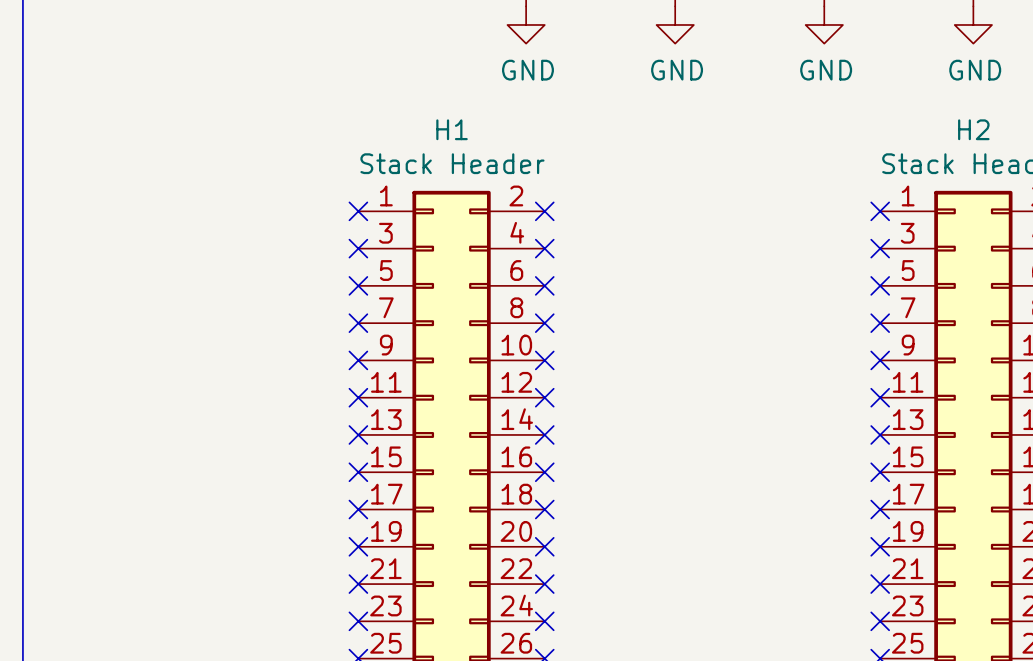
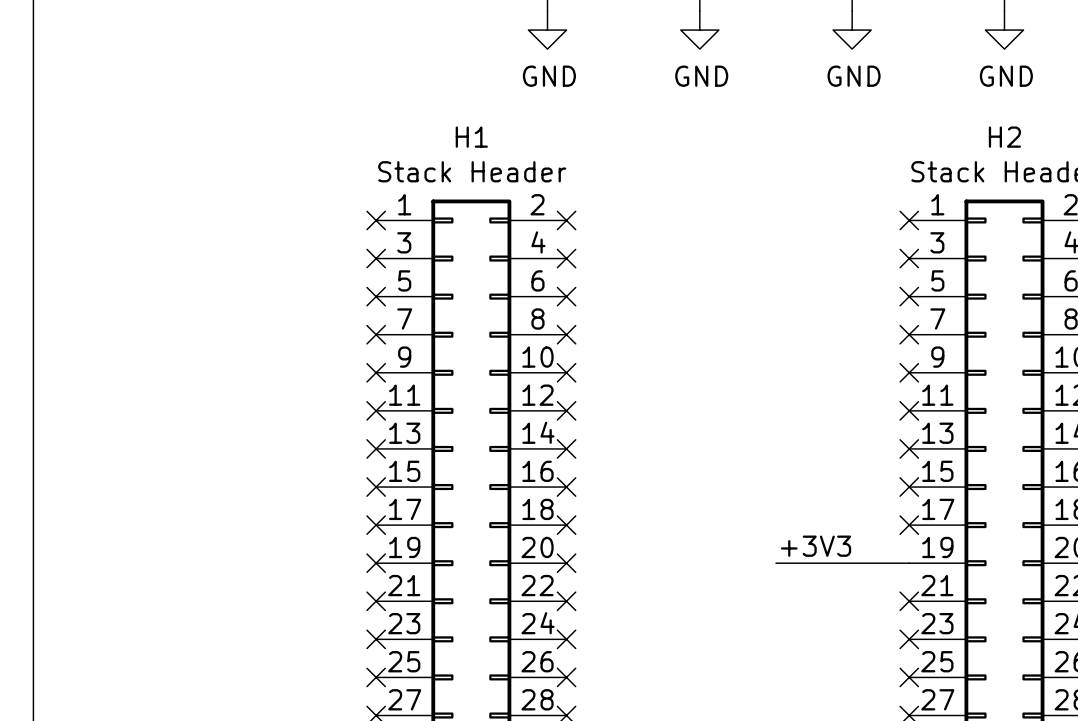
label: none -> +3V3 (816, 546)
wire: none -> (775, 563) (909, 563)
no-connect mark: (880, 546) -> none

